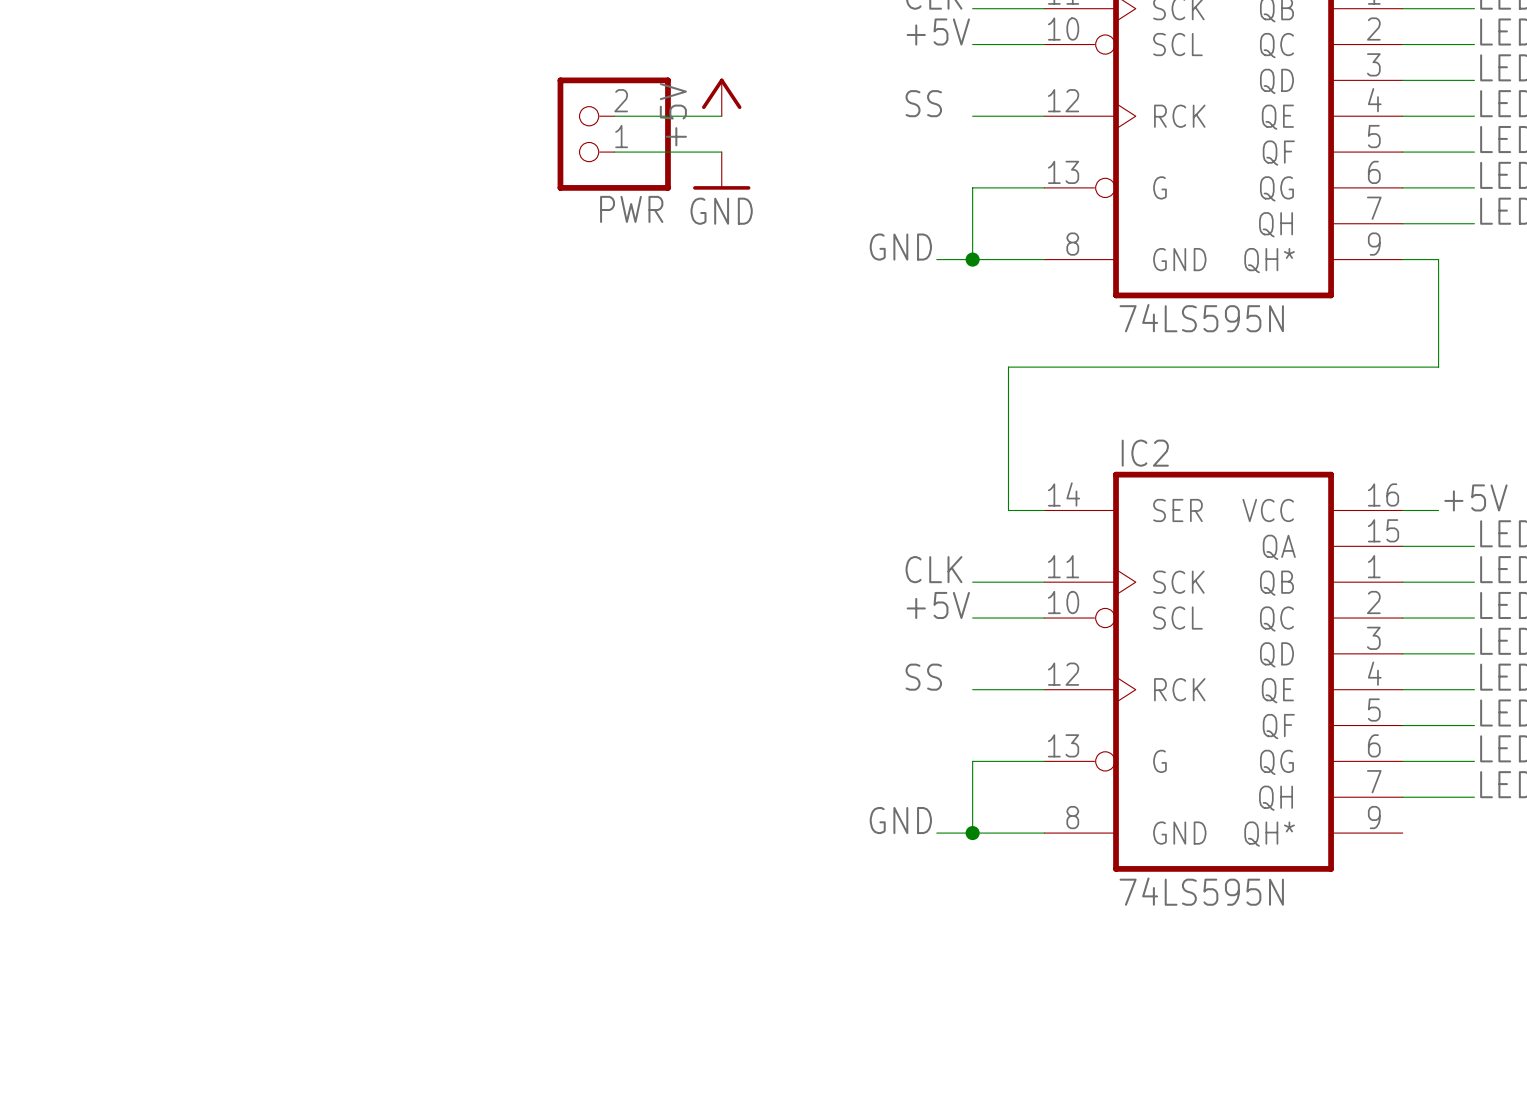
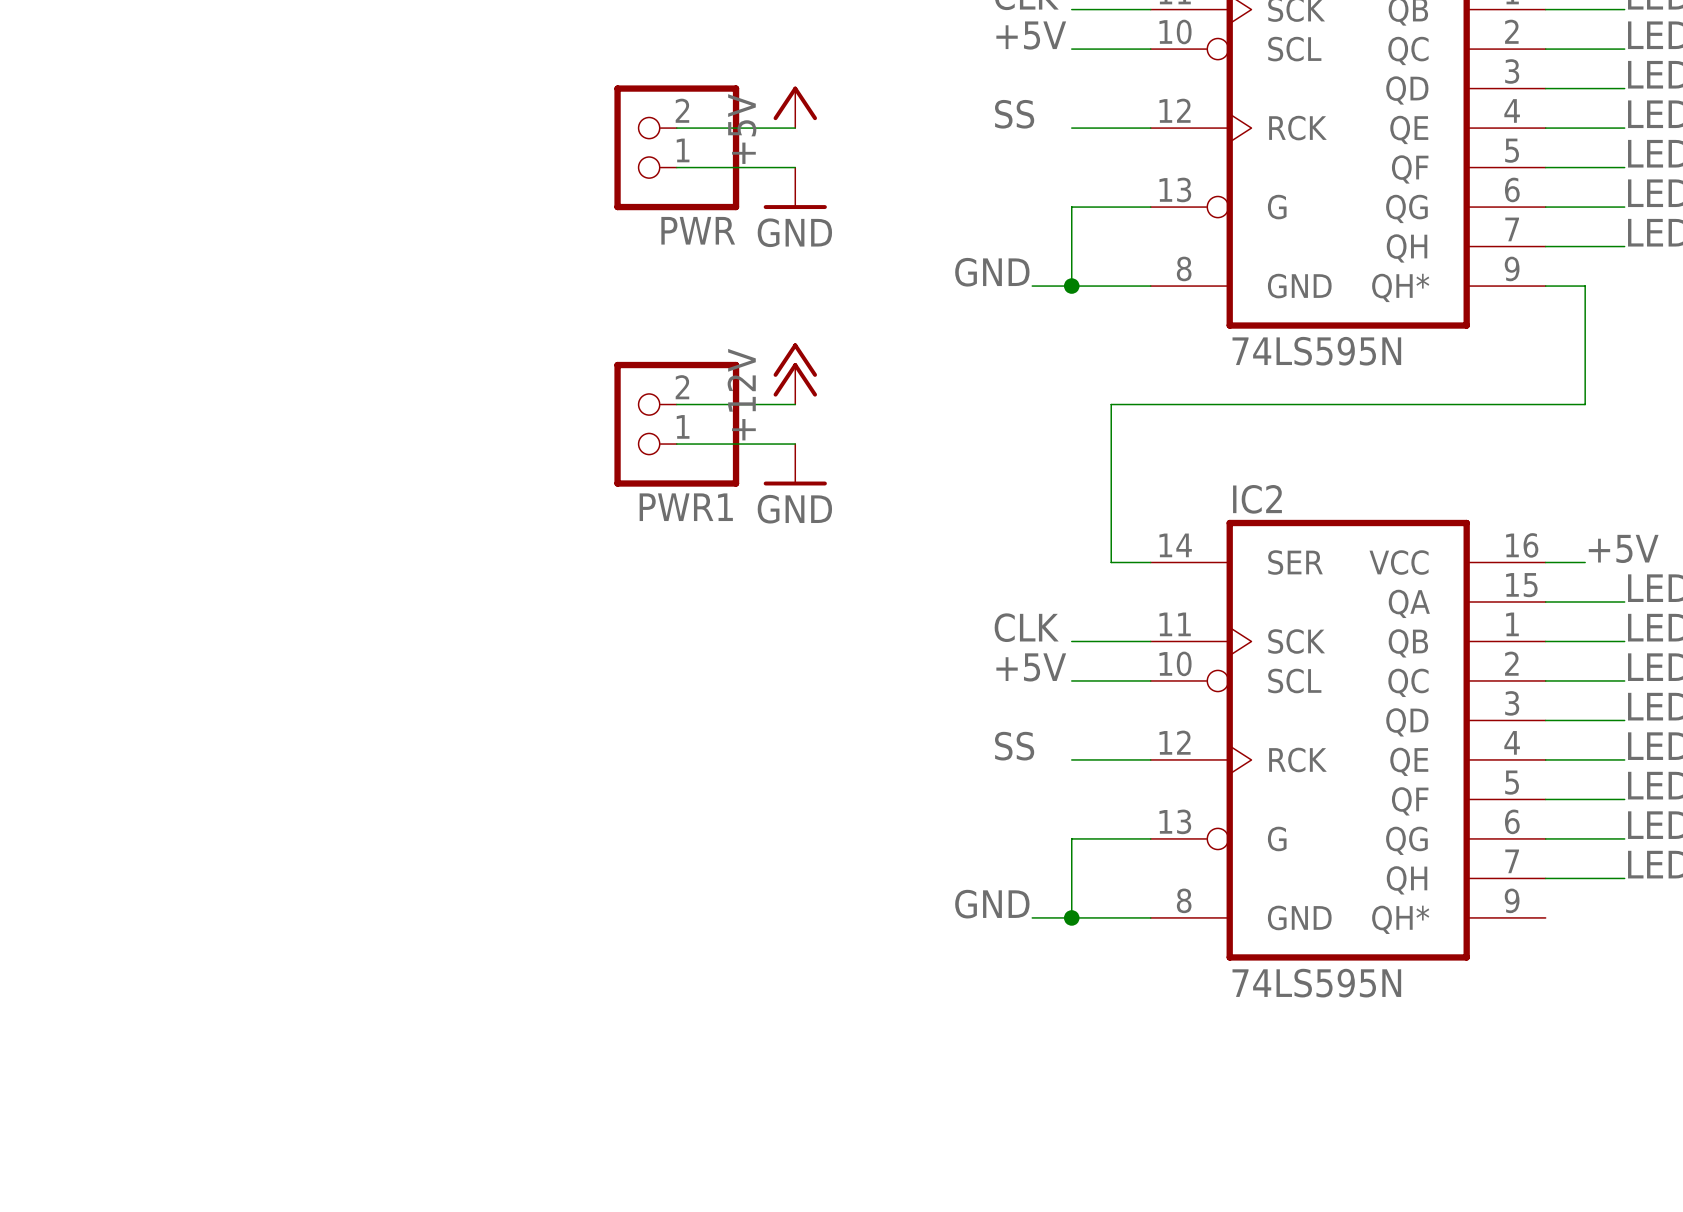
power symbol: none -> +12V (795, 373)
wire: none -> (676, 404) (795, 404)
PWR1: none -> (676, 424)
wire: none -> (676, 444) (795, 444)
power symbol: none -> GND (795, 464)

